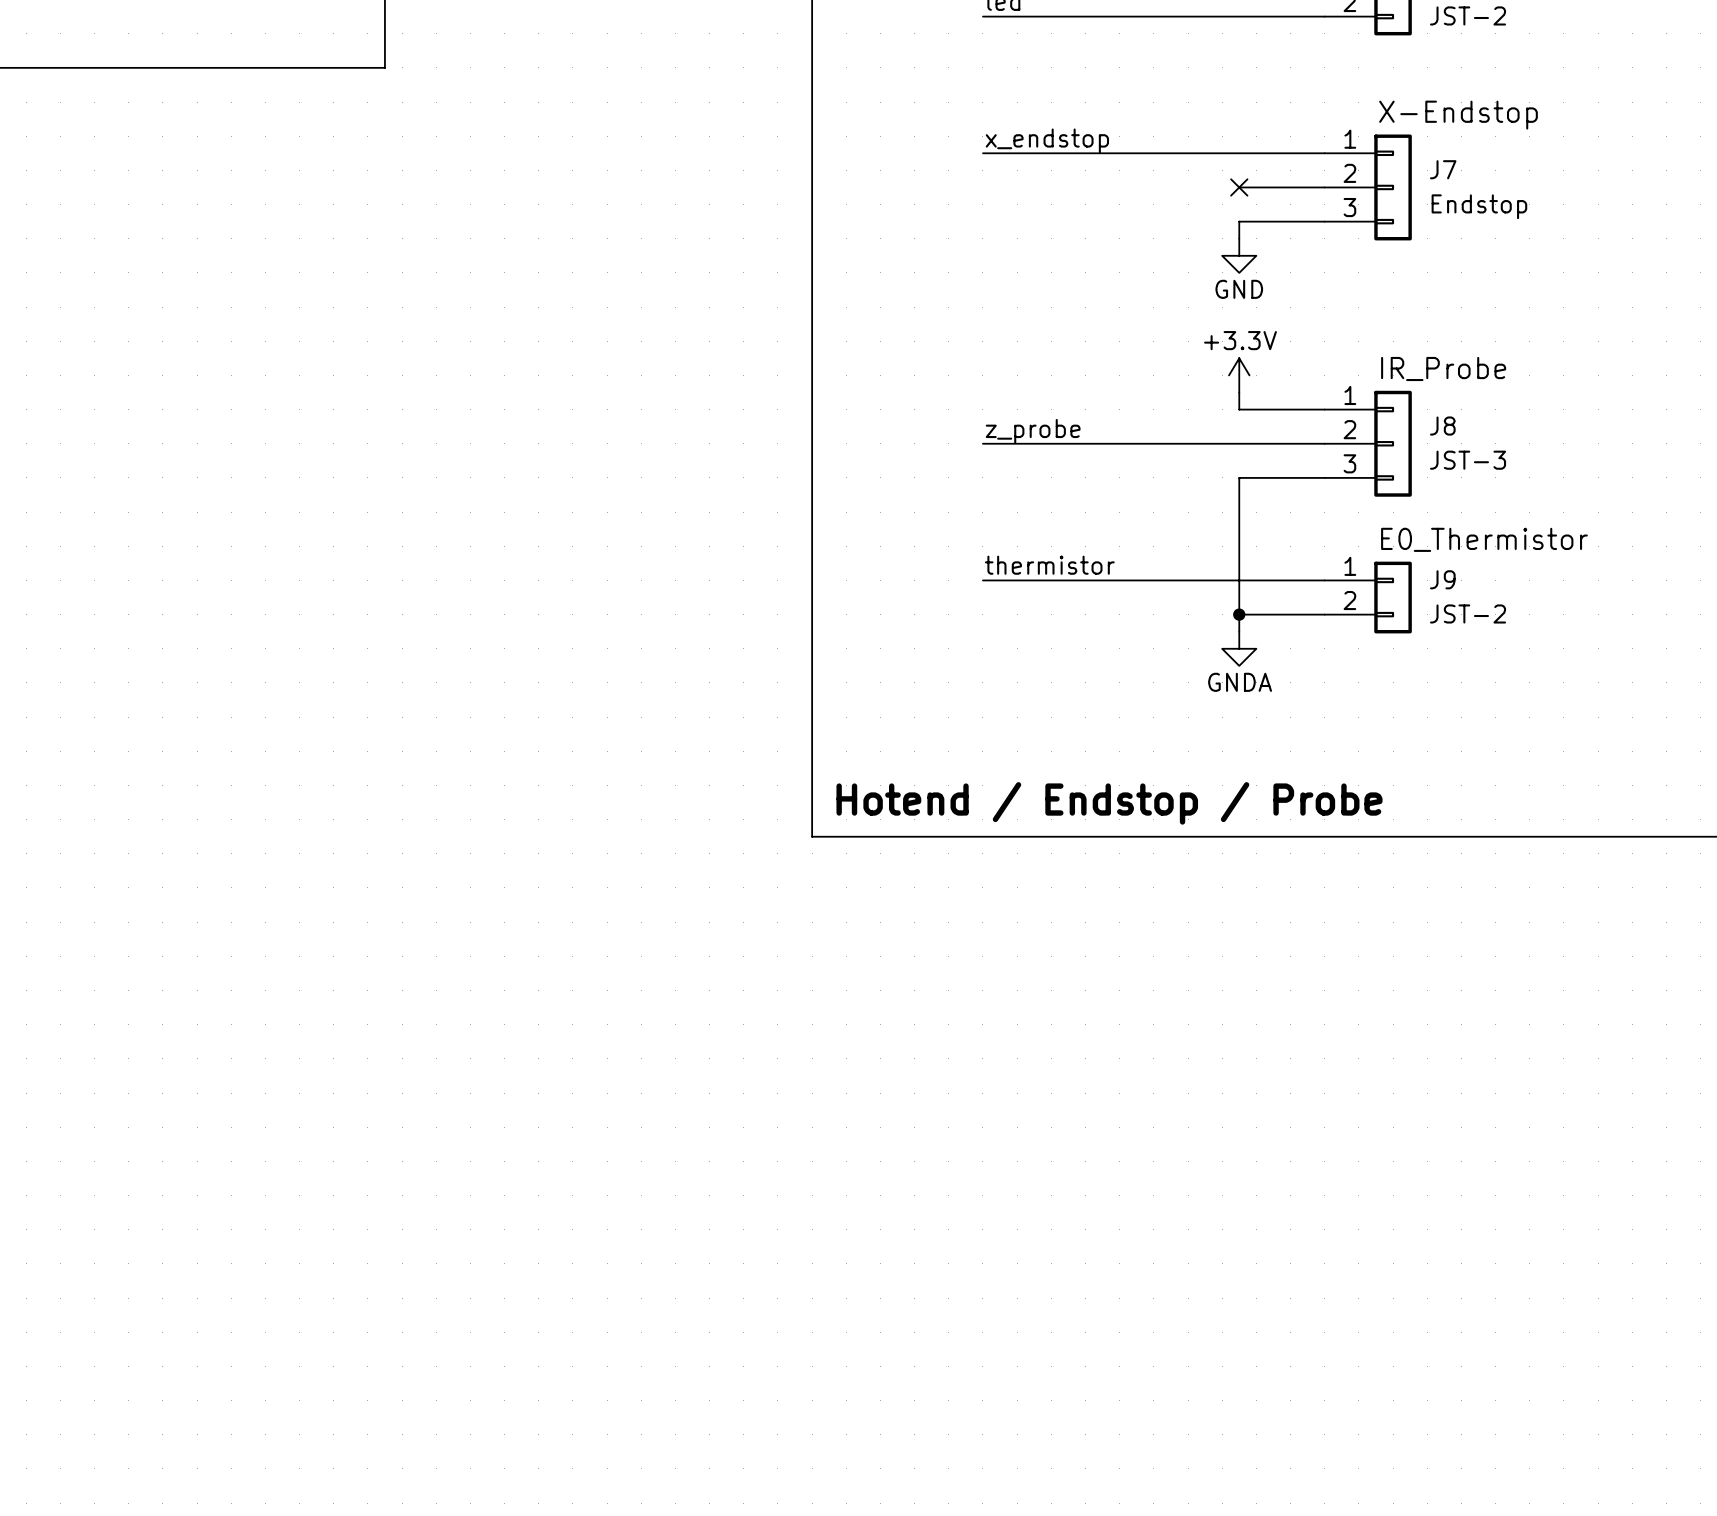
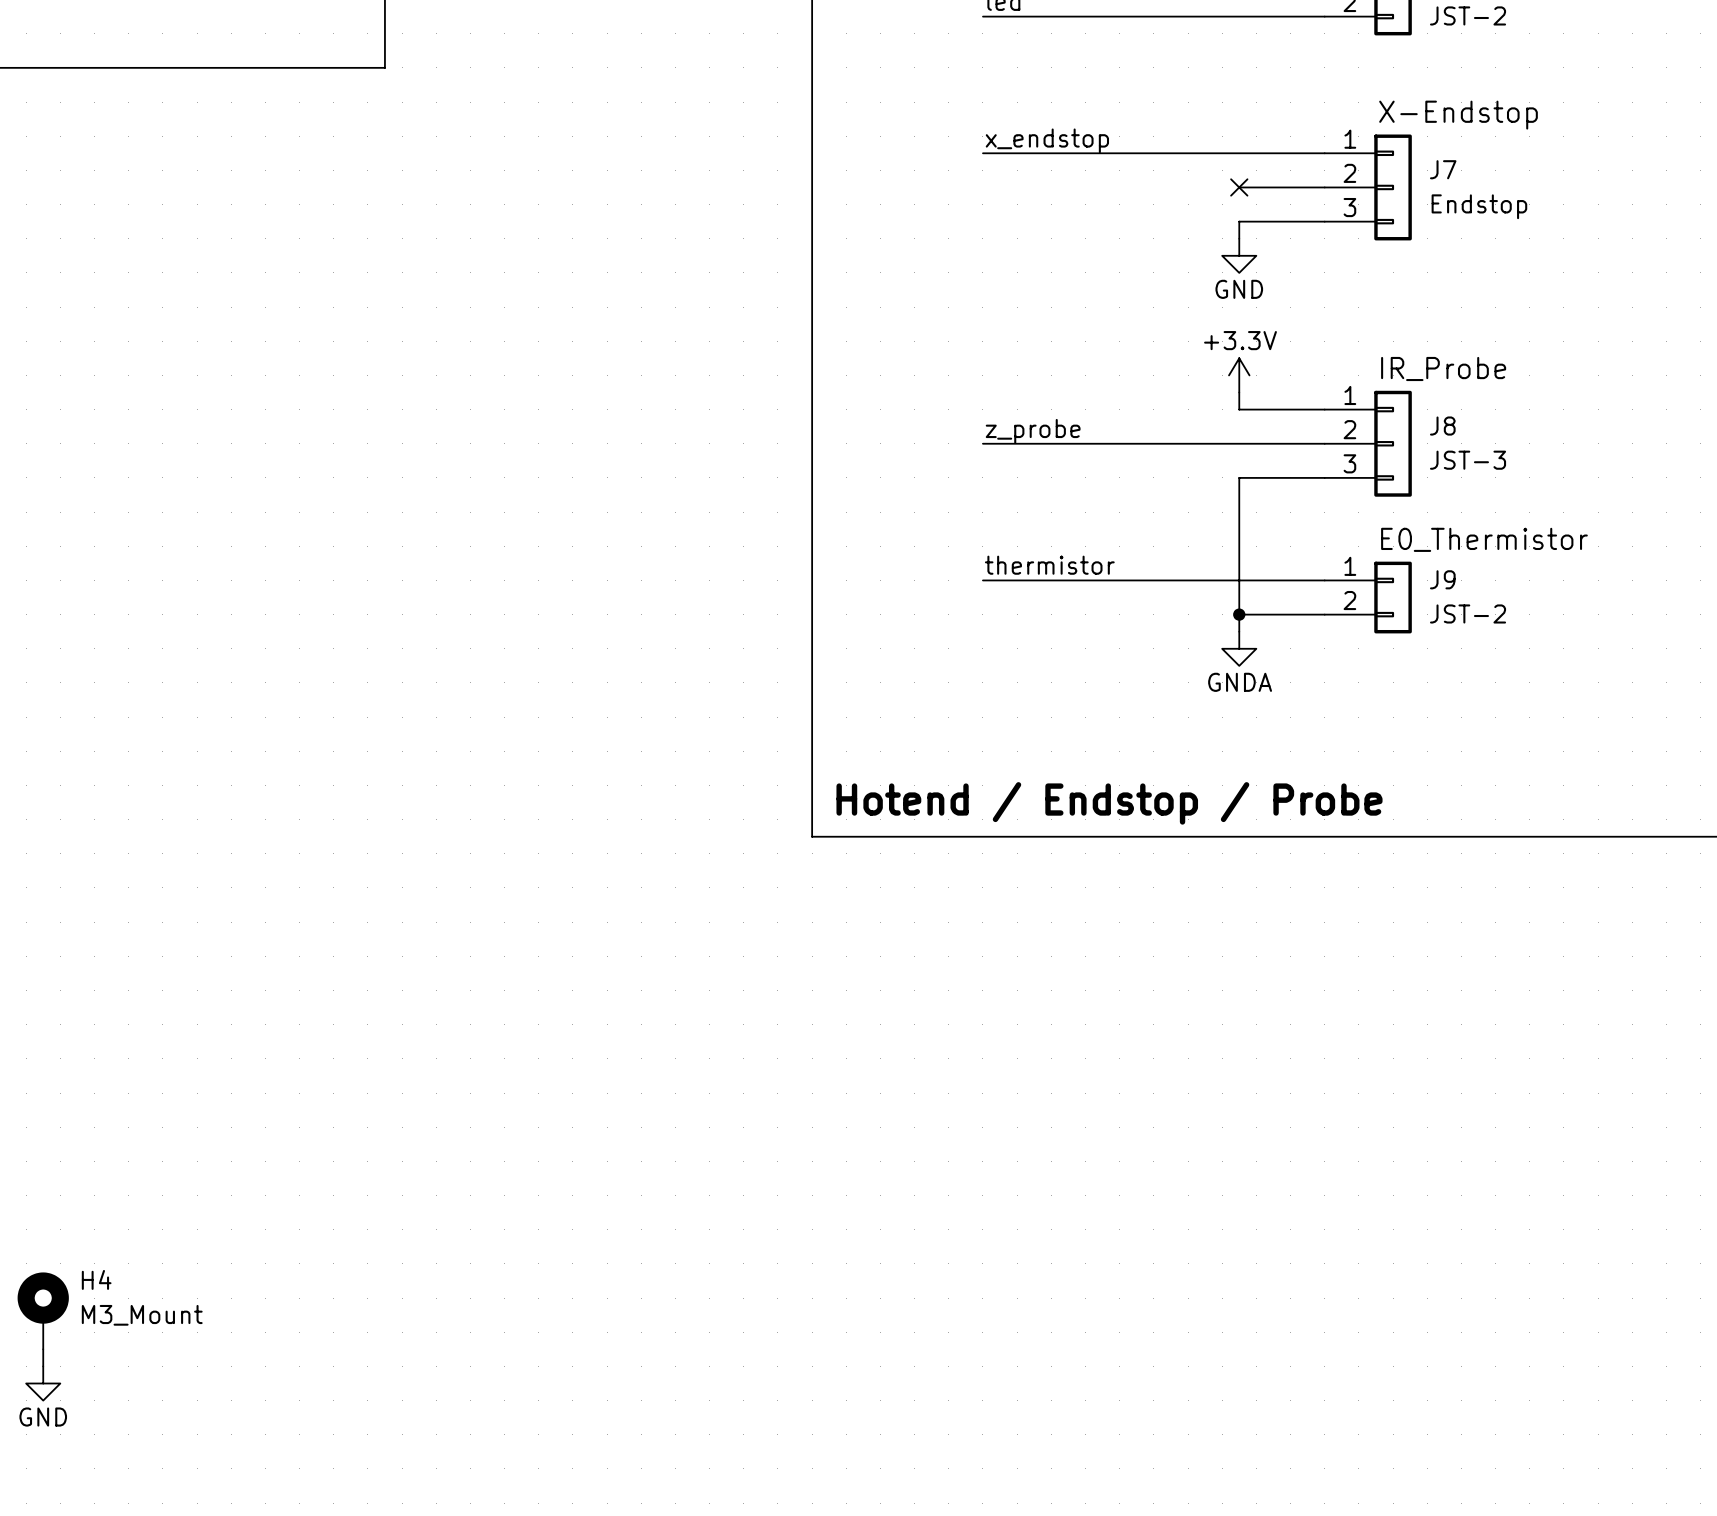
H4: none -> M3_Mount (43, 1310)
wire: none -> (43, 1349) (43, 1366)
power symbol: none -> GND (43, 1383)

